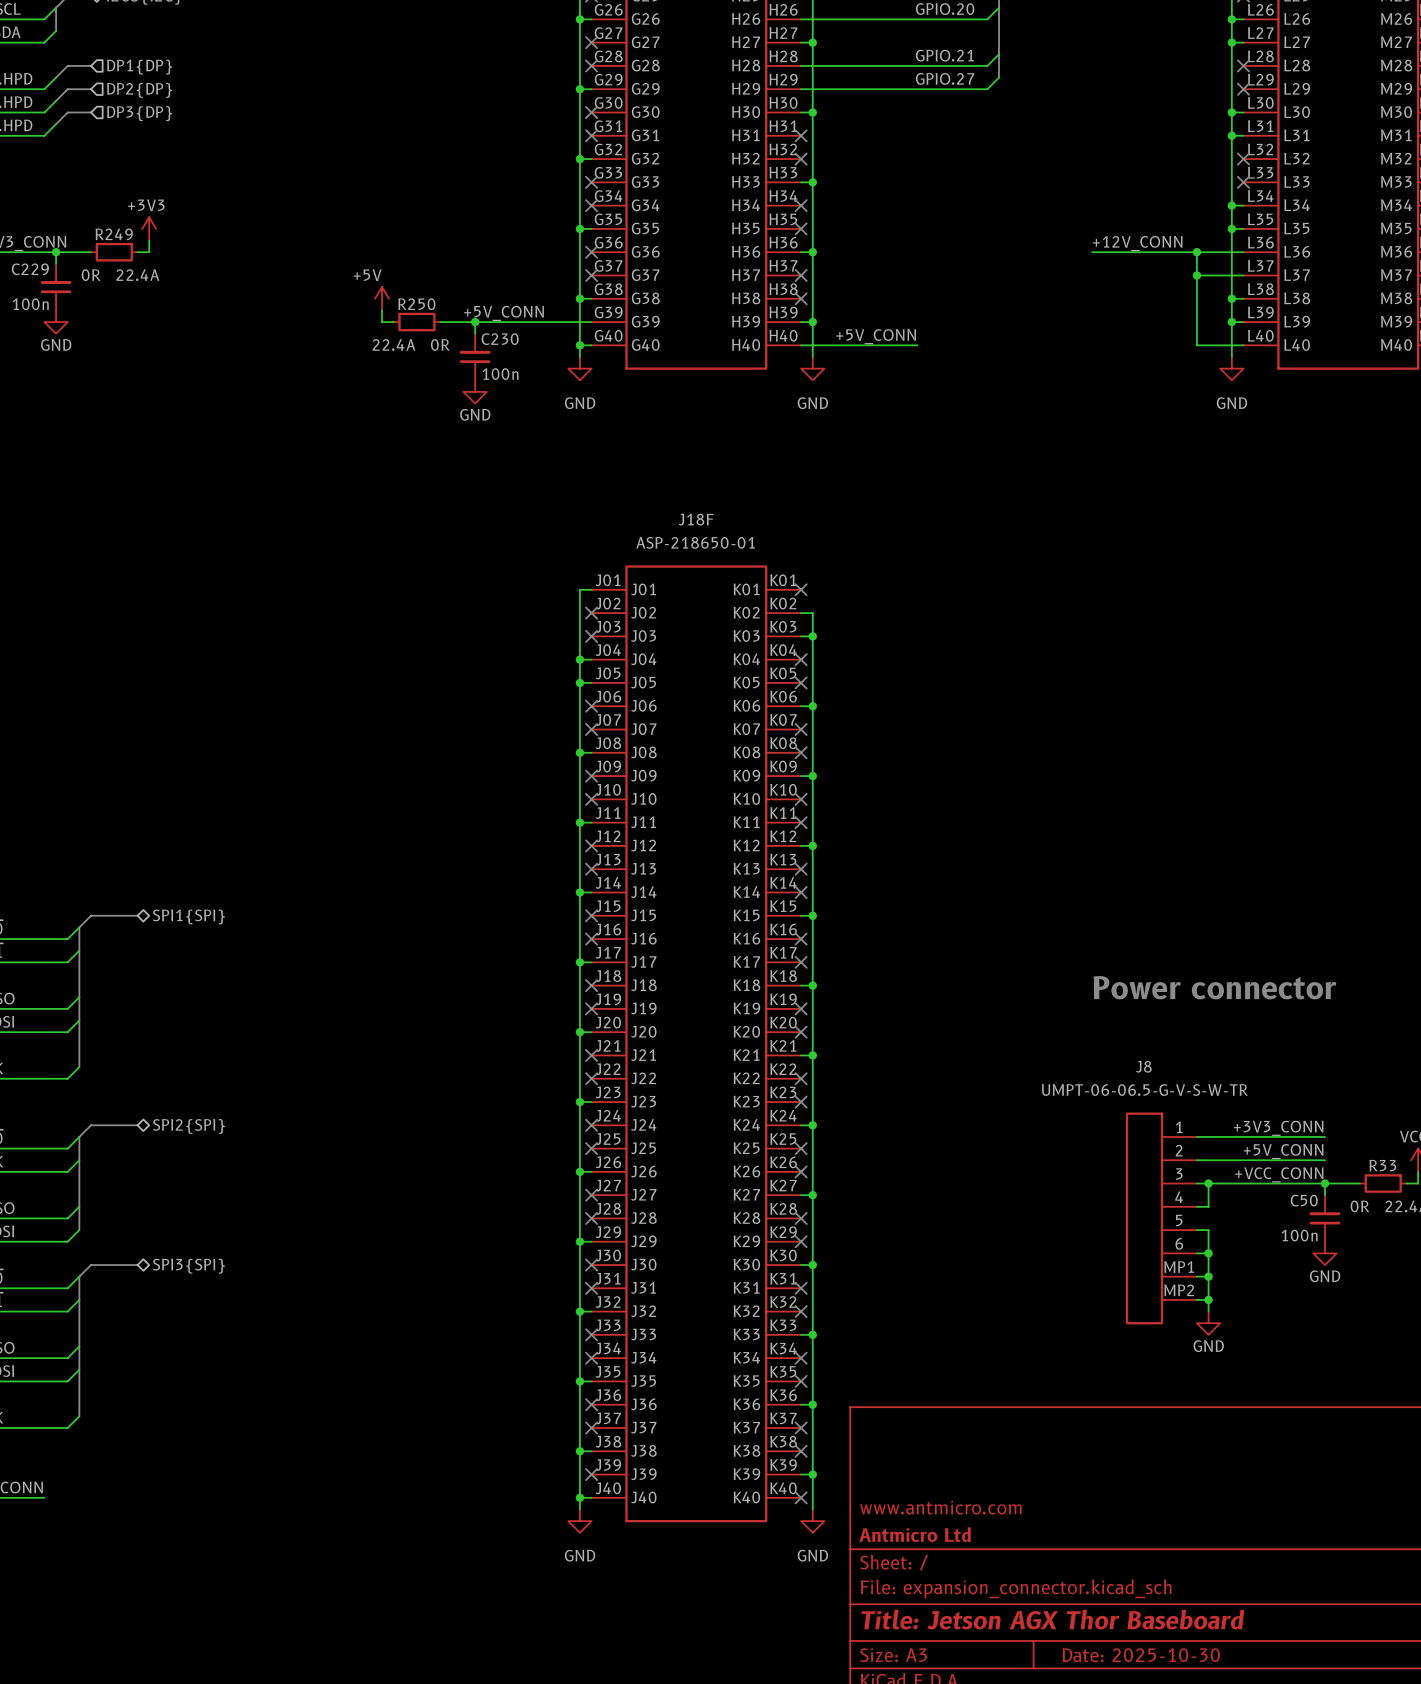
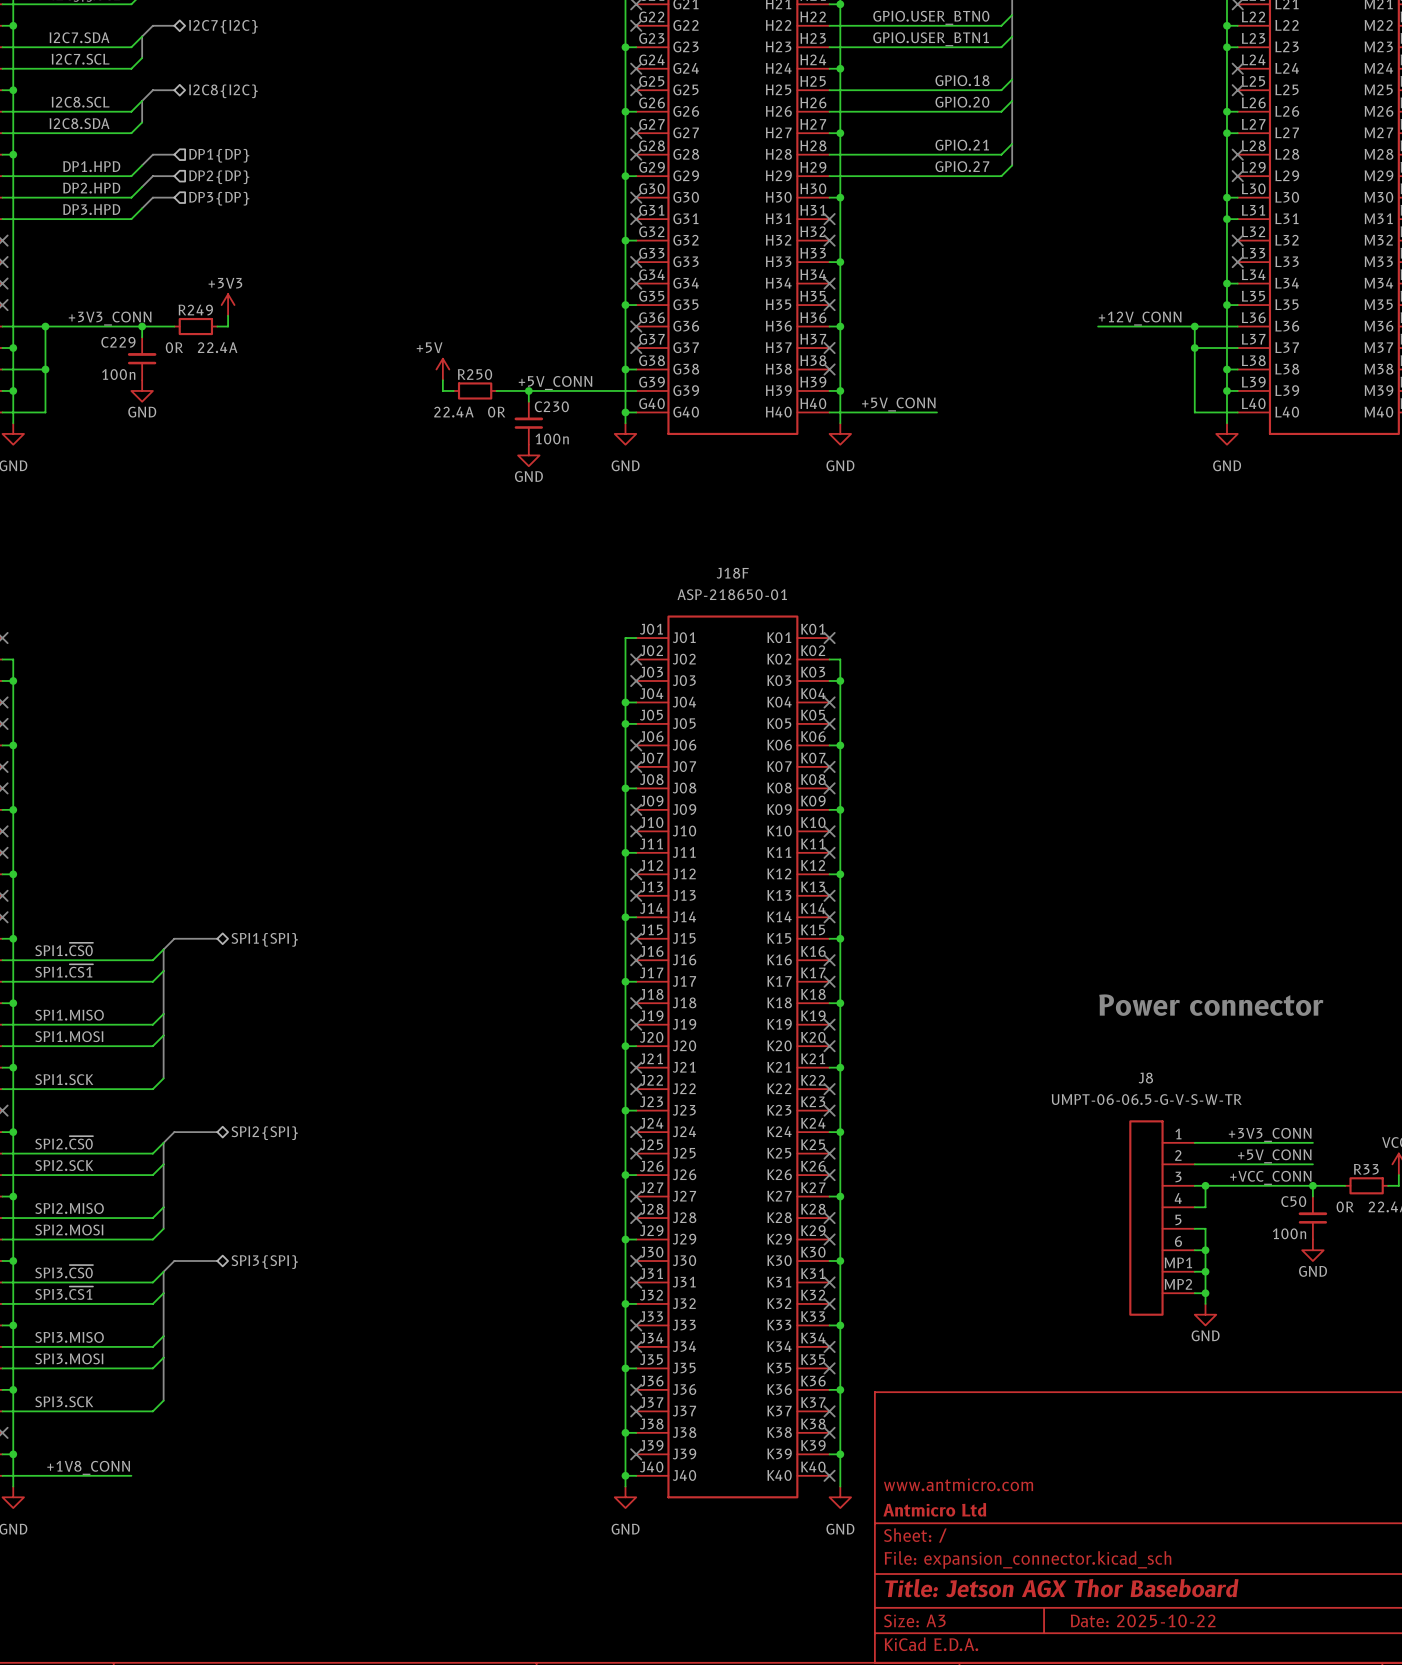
title block: Date: 2025-10-30 (1141, 1655) -> Date: 2025-10-22 (1143, 1620)

